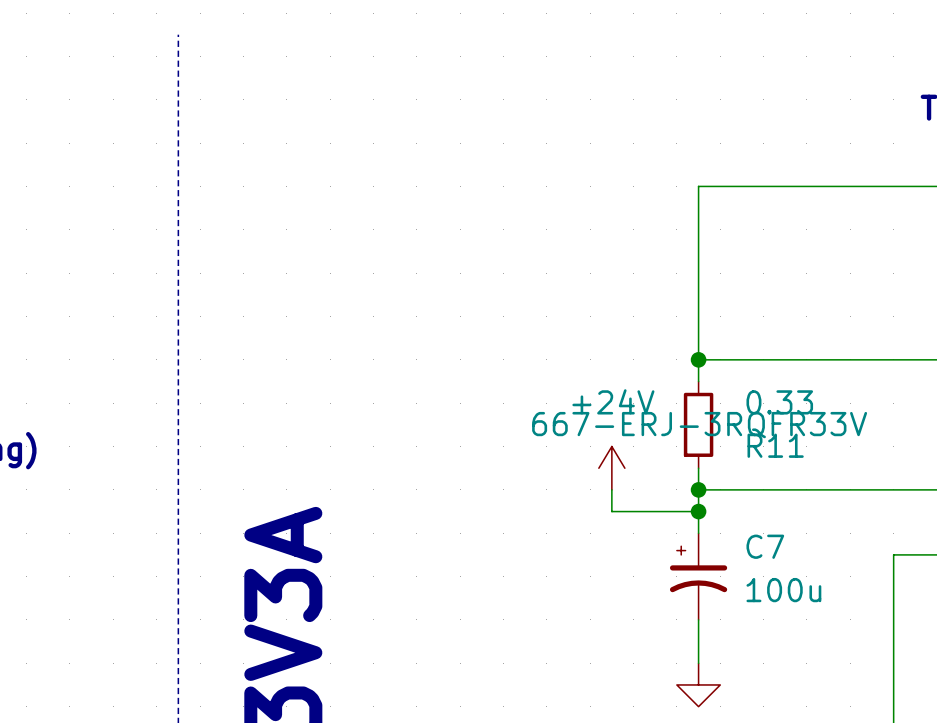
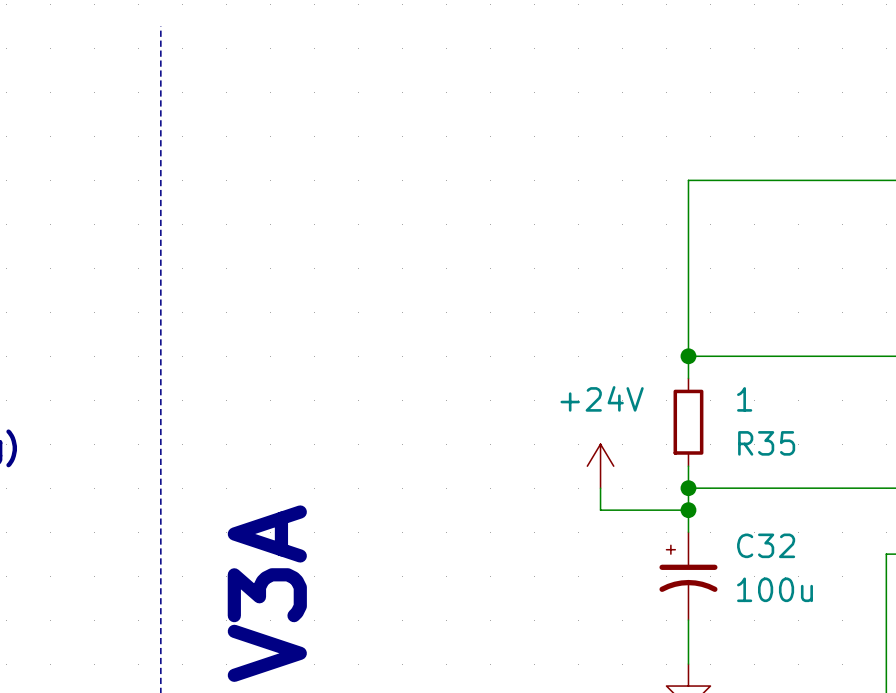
R11 value: 0.33 (779, 402) -> 1 (744, 399)
R11 text: 667-ERJ-3RQFR33V (699, 425) -> none
R11 name: R11 (775, 445) -> R35 (766, 443)
C7 name: C7 (765, 546) -> C32 (766, 545)

